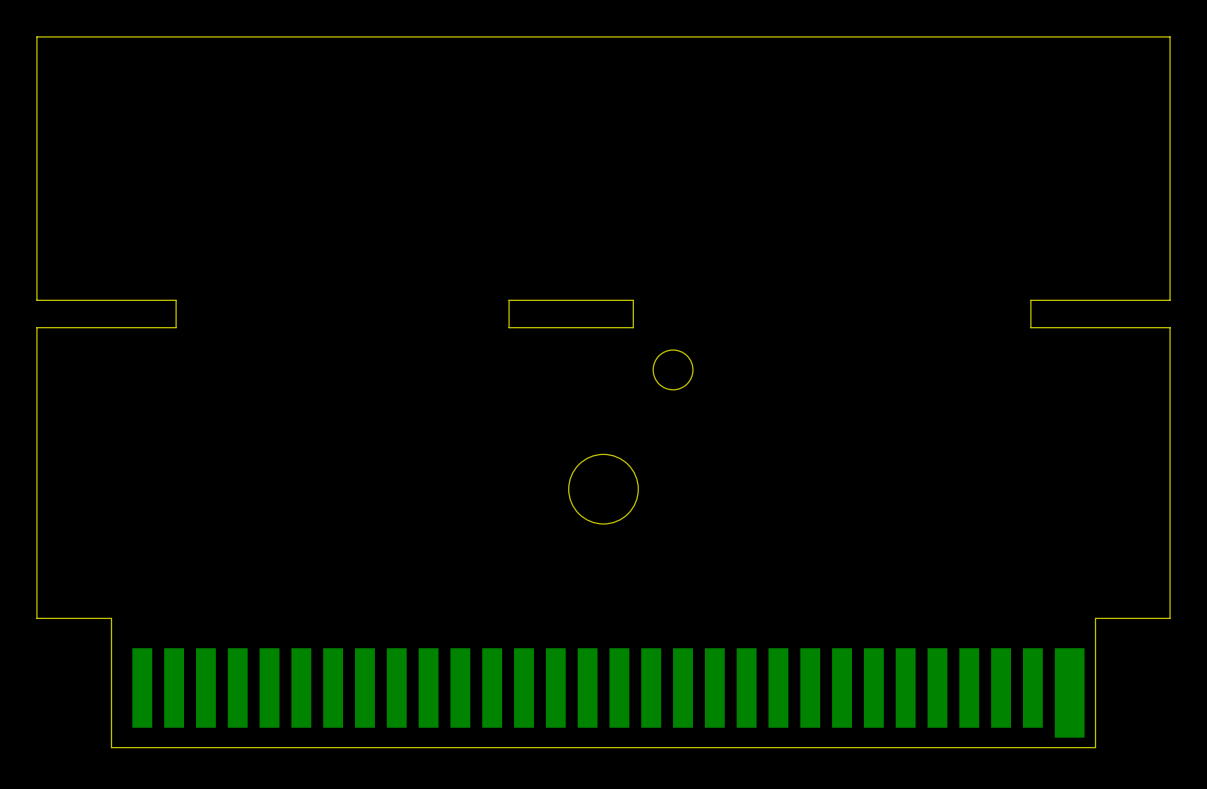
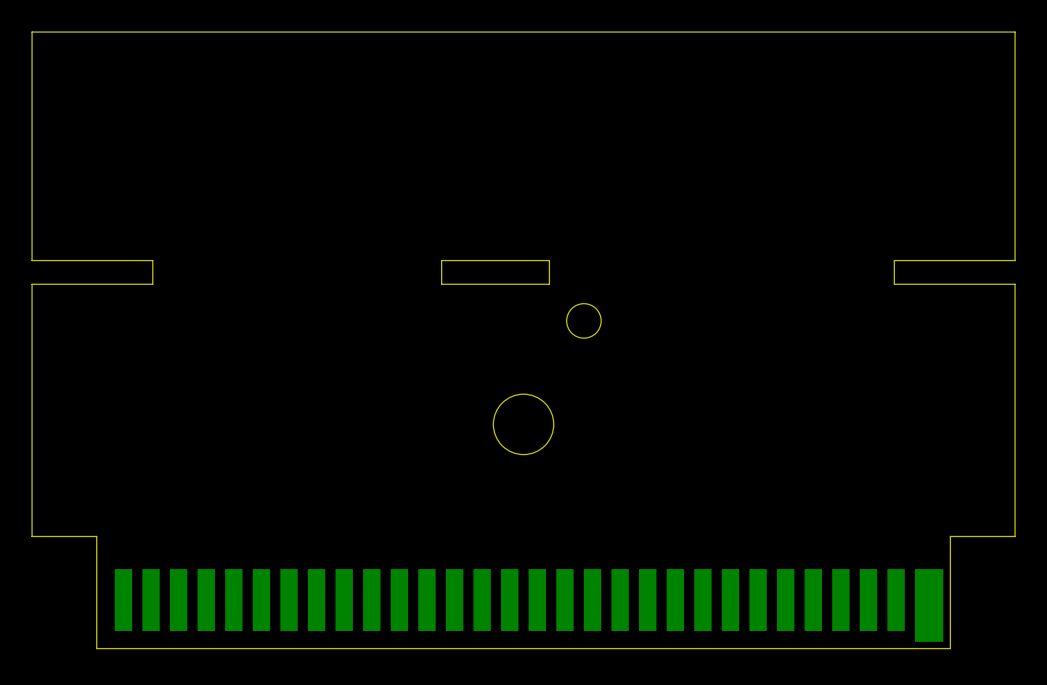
part footprint: [132, 648, 1085, 738] -> [114, 569, 944, 642]

